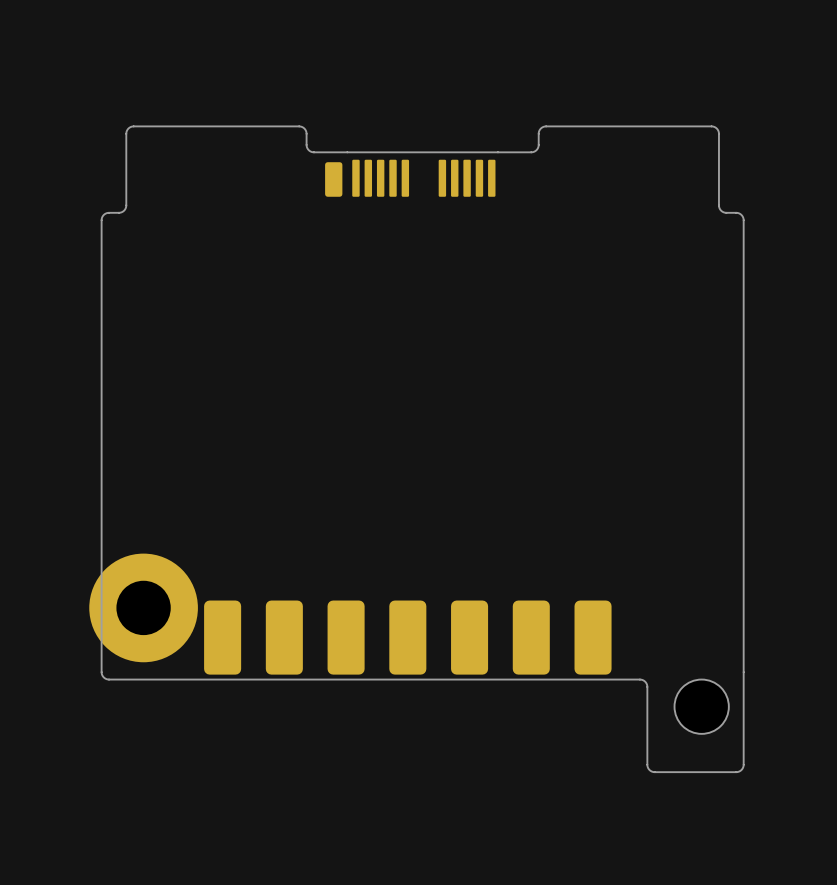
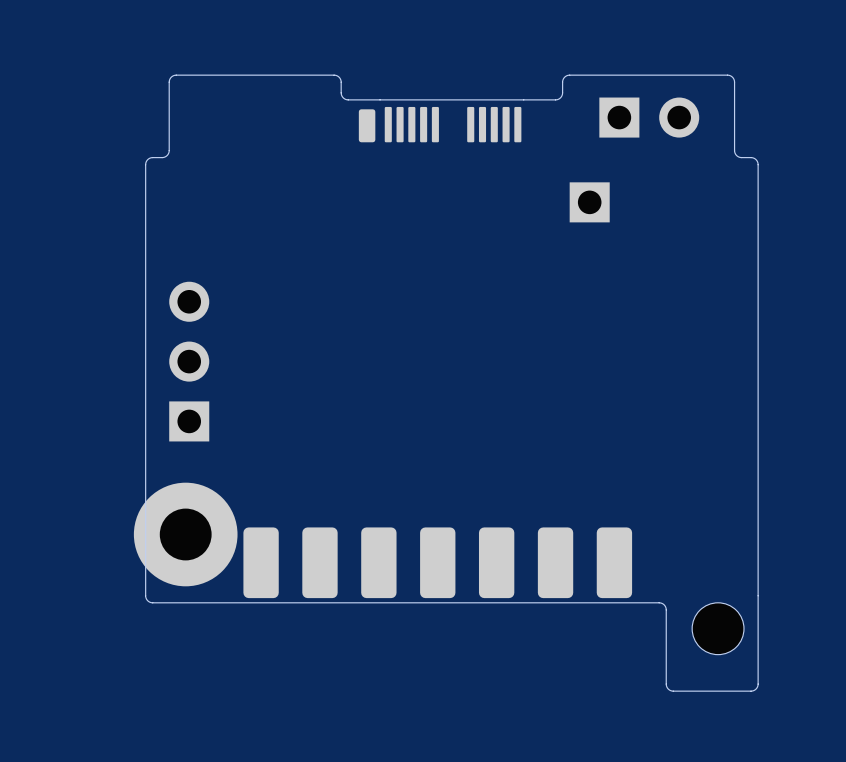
part: none -> (649, 117)
part: none -> (589, 202)
part: none -> (189, 361)

